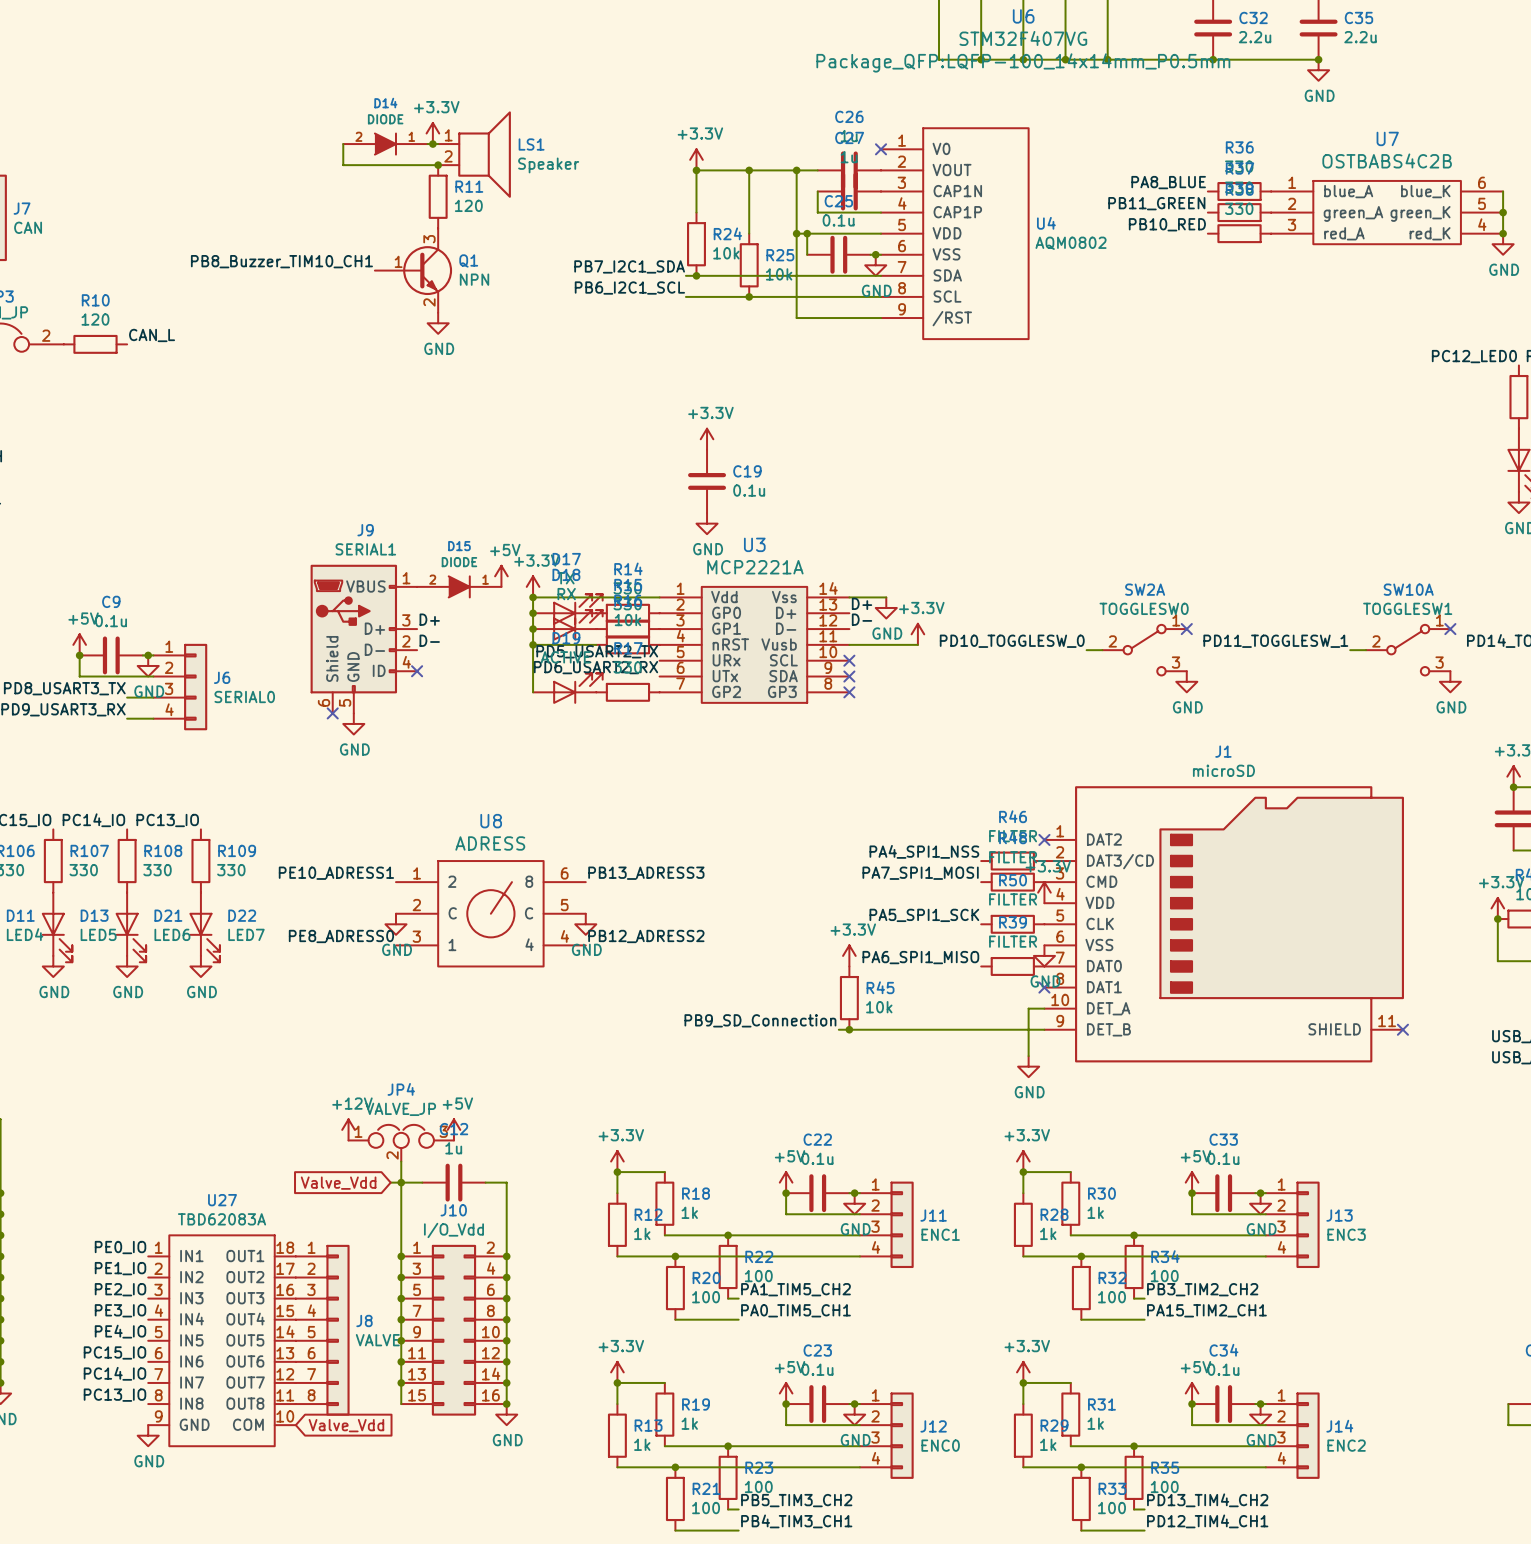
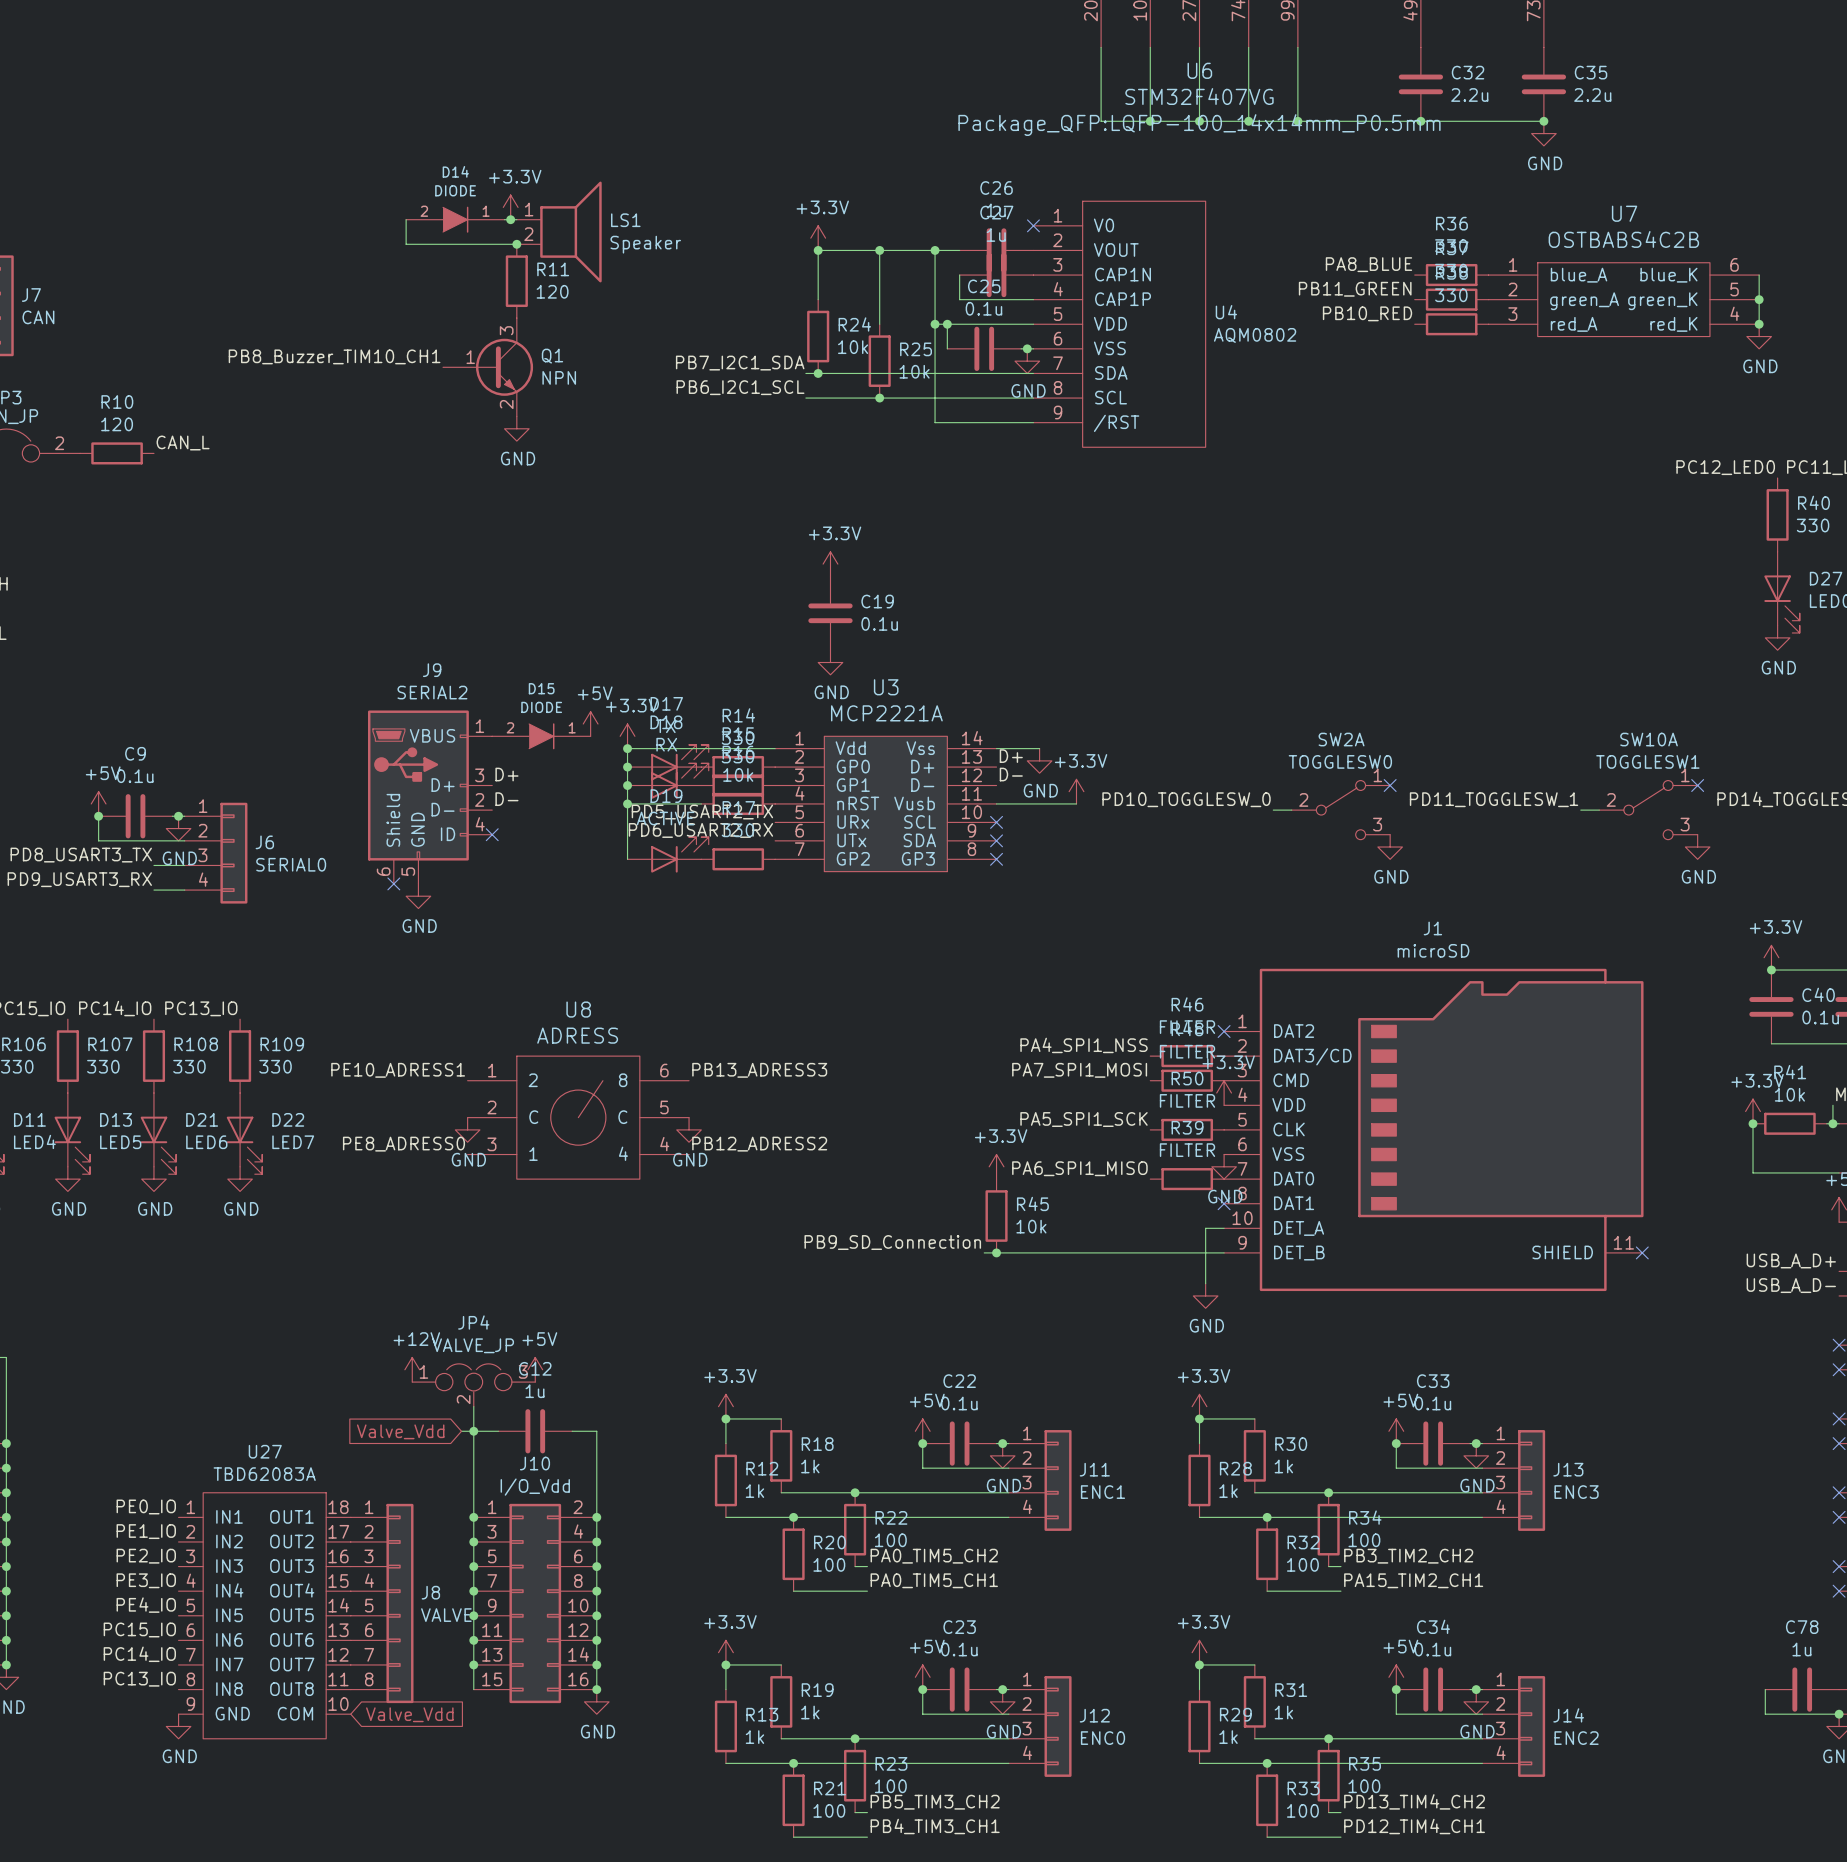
J9 value: SERIAL1 (365, 549) -> SERIAL2 (432, 692)
label: PA1_TIM5_CH2 (795, 1289) -> PA0_TIM5_CH2 (934, 1556)

